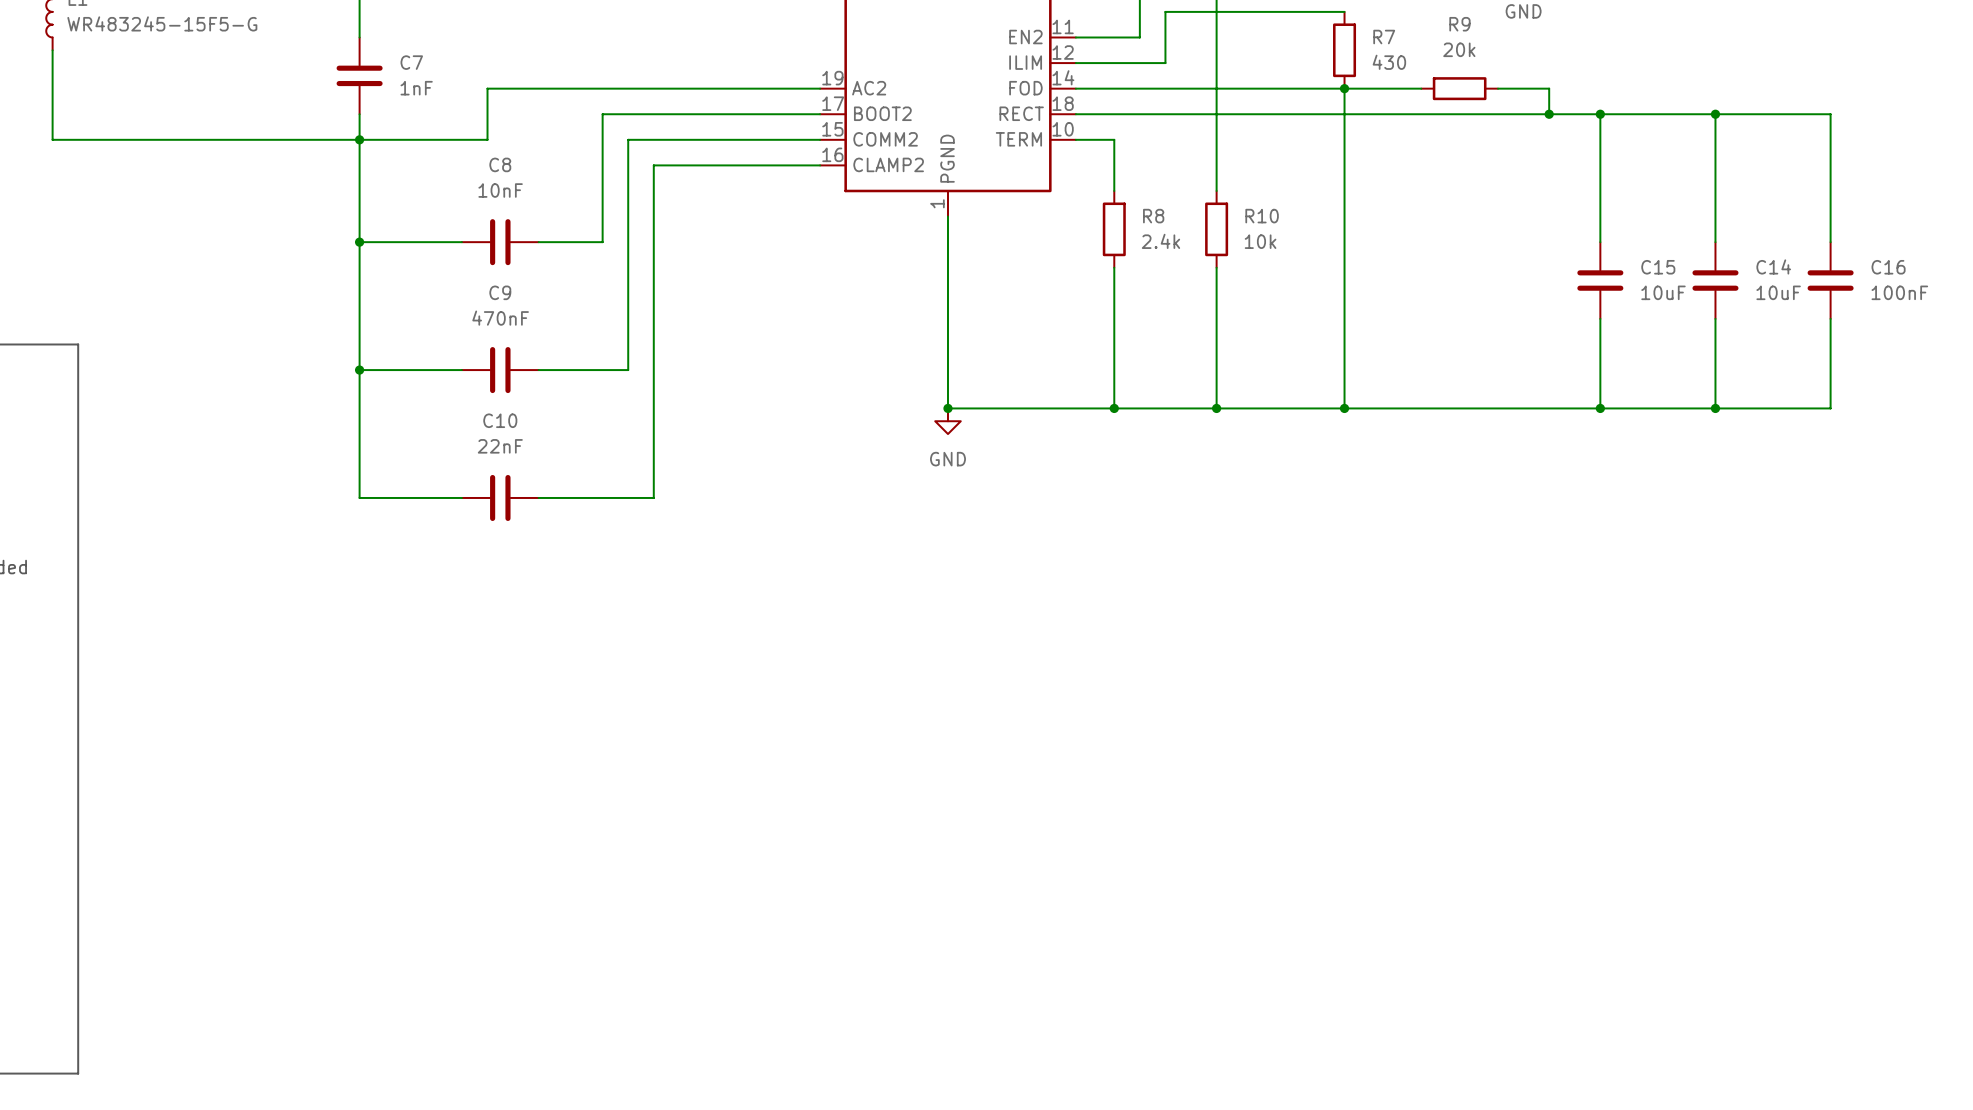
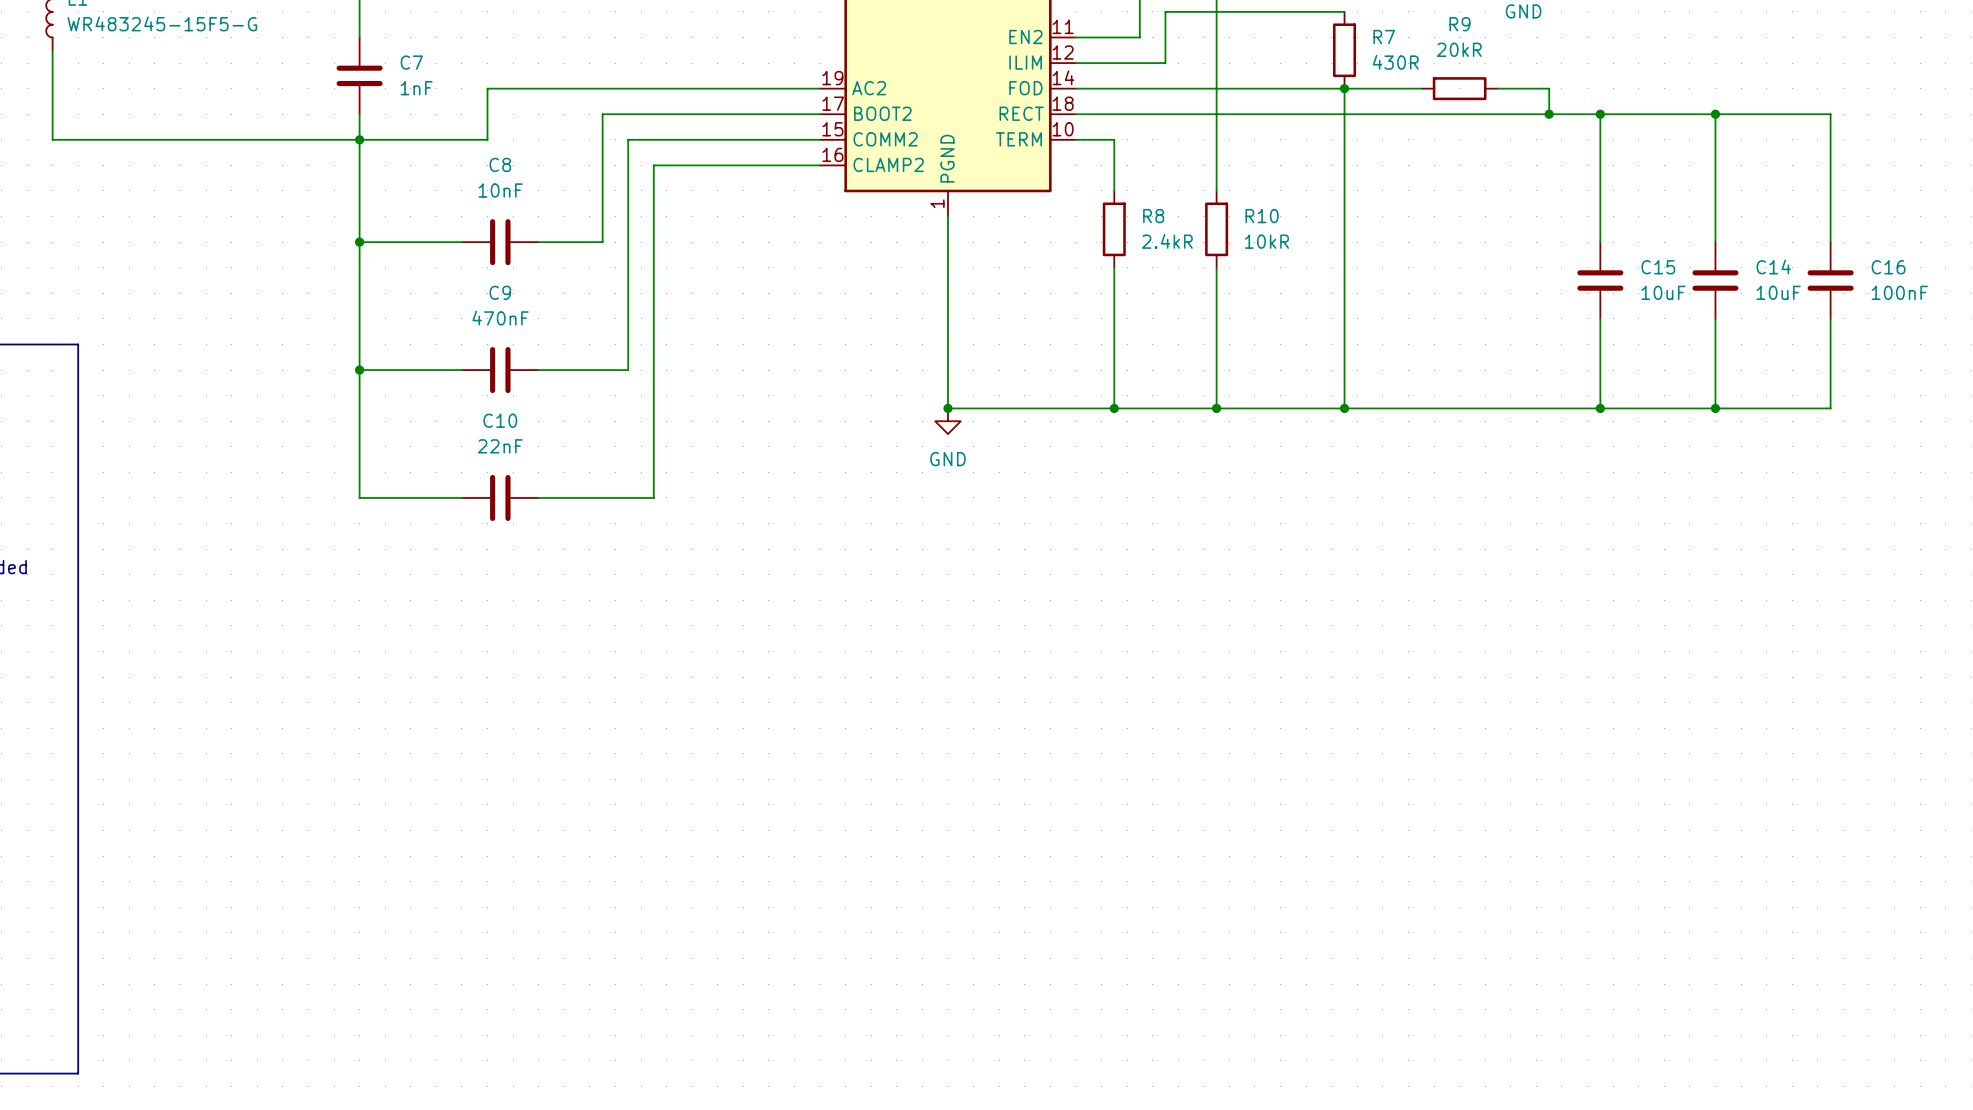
R9 value: 20k (1459, 49) -> 20kR (1459, 49)
R7 value: 430 (1389, 62) -> 430R (1395, 62)
R8 value: 2.4k (1160, 241) -> 2.4kR (1167, 241)
R10 value: 10k (1260, 241) -> 10kR (1266, 241)

